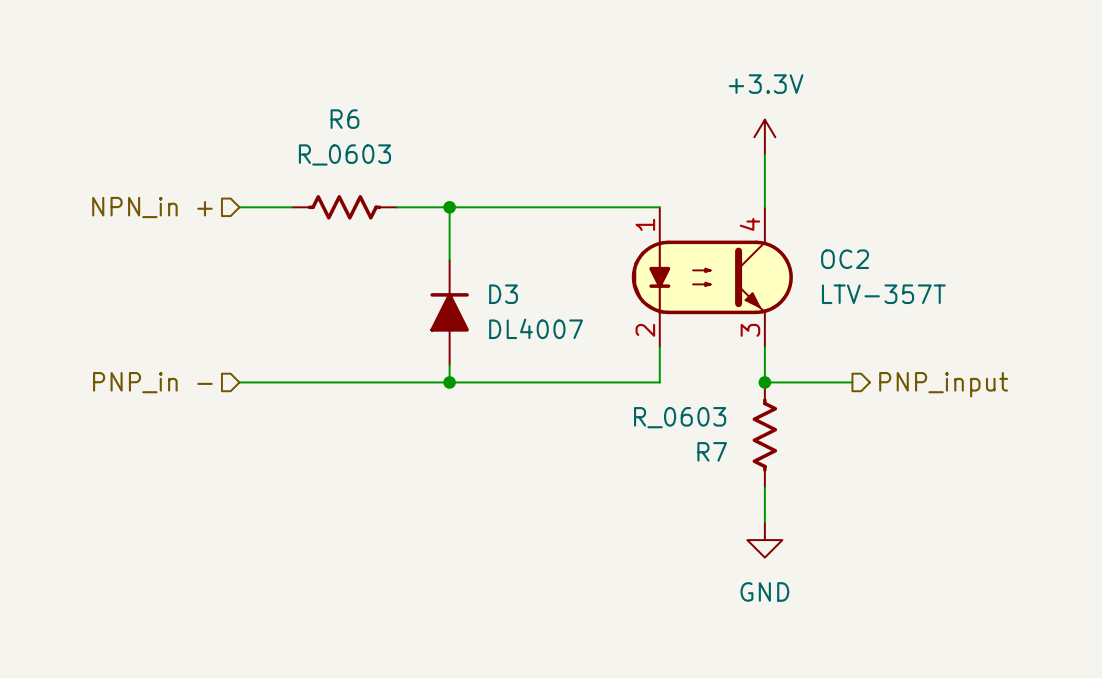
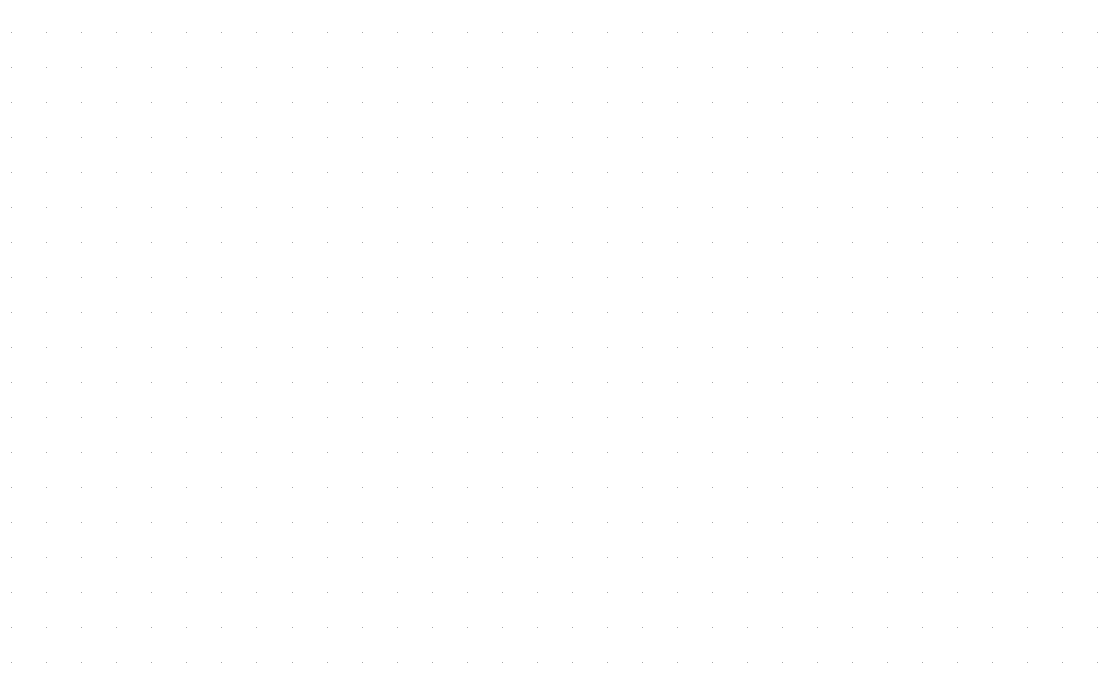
power symbol: +3.3V (764, 137) -> none
wire: (764, 154) (764, 207) -> none
hierarchical label: NPN_in + (152, 207) -> none
wire: (239, 207) (292, 207) -> none
R6: R_0603 (344, 207) -> none
wire: (397, 207) (659, 207) -> none
wire: (449, 207) (449, 259) -> none
junction: (449, 207) -> none
OC2: LTV-357T (712, 277) -> none
D3: DL4007 (449, 312) -> none
wire: (659, 347) (659, 382) (239, 382) -> none
wire: (764, 347) (764, 382) (852, 382) -> none
wire: (449, 364) (449, 382) -> none
hierarchical label: PNP_in - (152, 382) -> none
junction: (449, 382) -> none
junction: (764, 382) -> none
hierarchical label: PNP_input (943, 384) -> none
R7: R_0603 (764, 435) -> none
wire: (764, 487) (764, 522) -> none
power symbol: GND (764, 540) -> none

